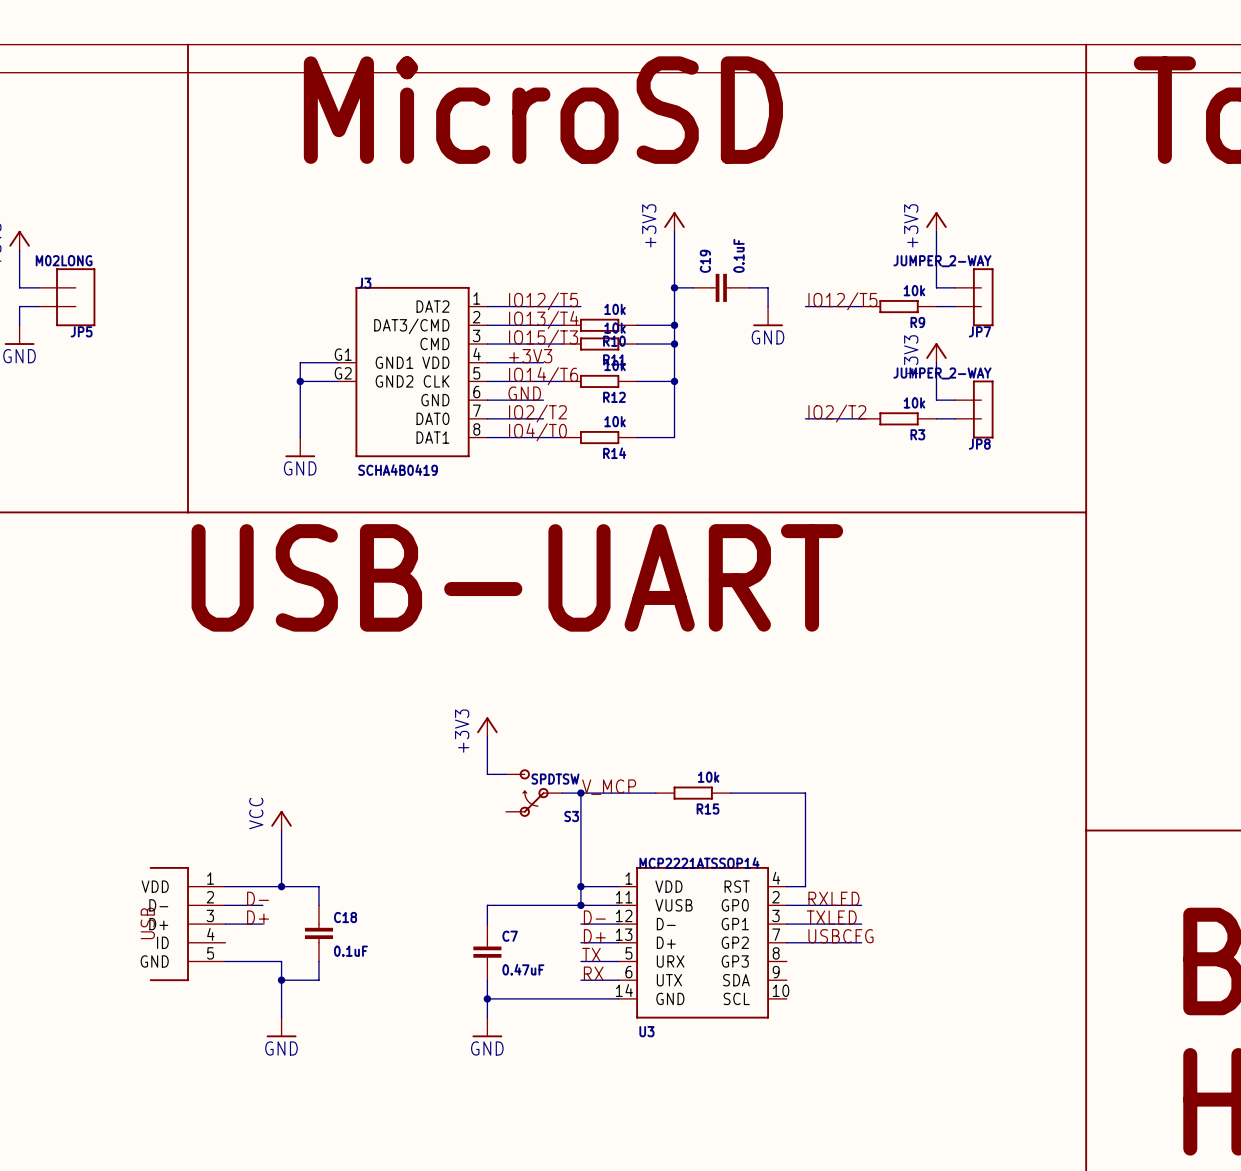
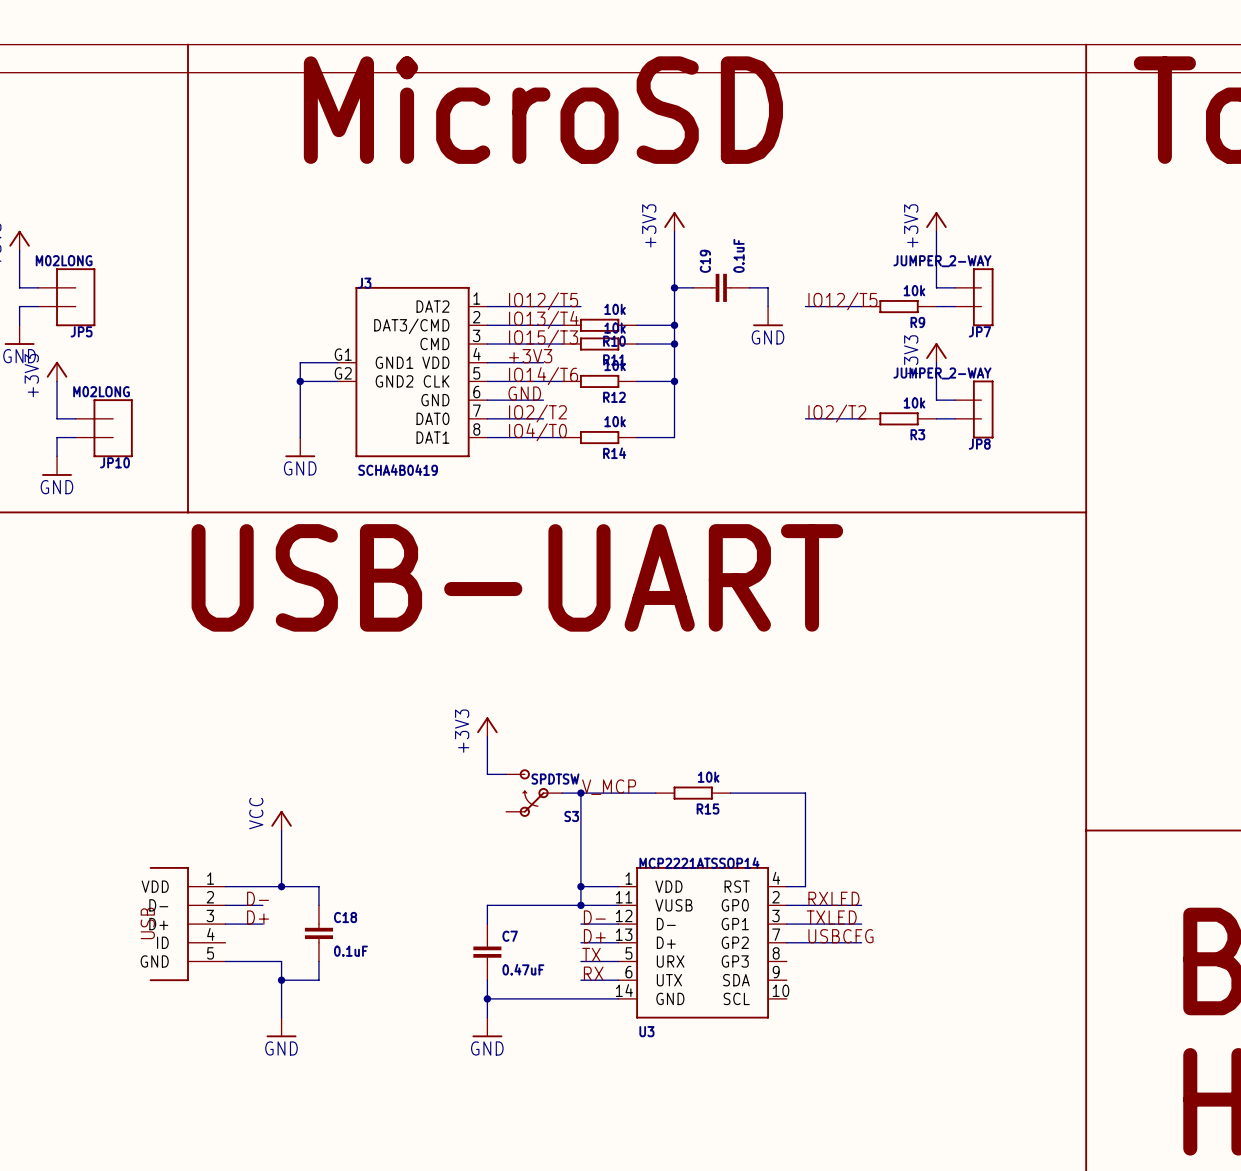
power symbol: none -> +3V3 (57, 371)
wire: none -> (57, 381) (57, 418) (75, 418)
JP10: none -> M02LONG (104, 428)
wire: none -> (75, 437) (57, 437) (57, 456)
power symbol: none -> GND (57, 466)

